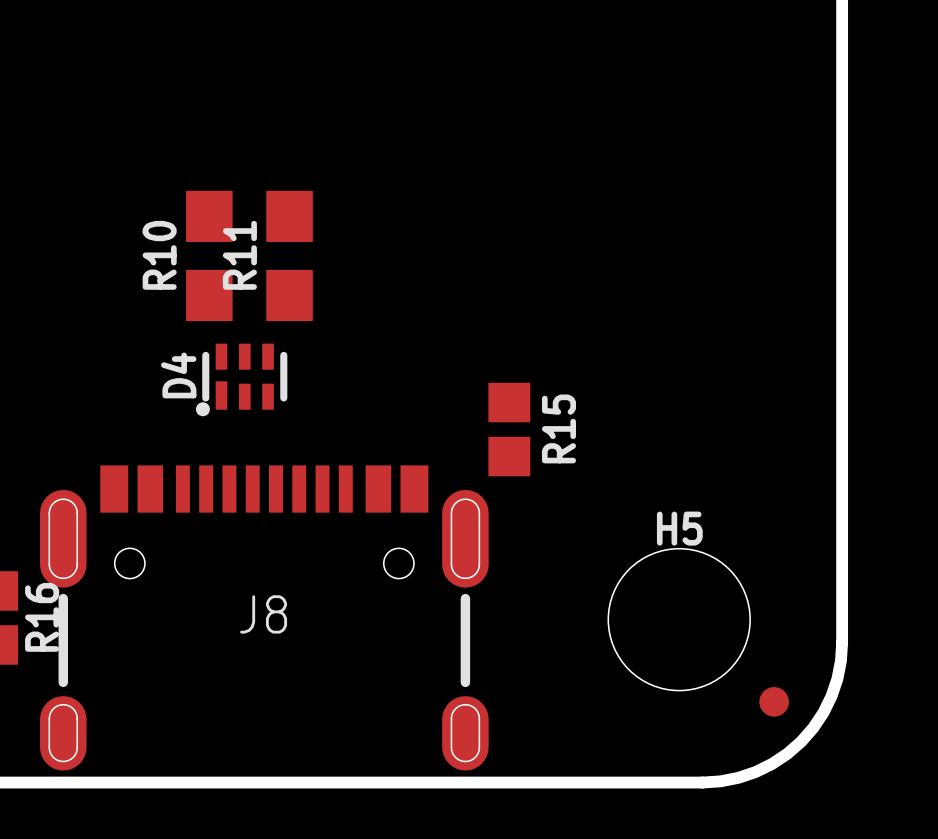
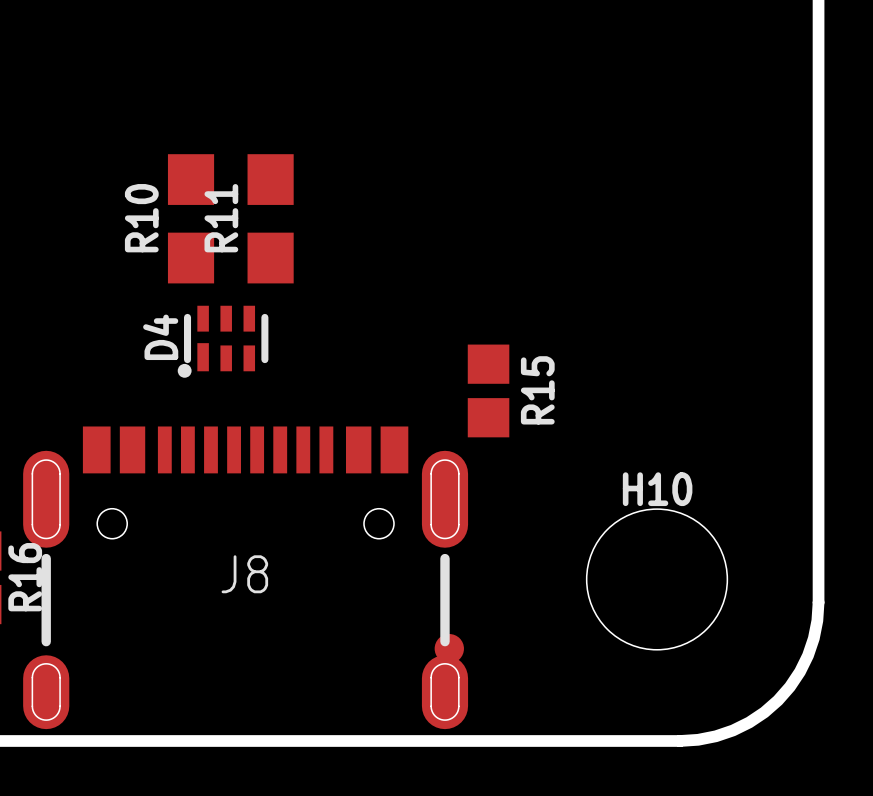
H5 name: H5 (679, 528) -> H10 (657, 489)
part position: (774, 701) -> (449, 648)

